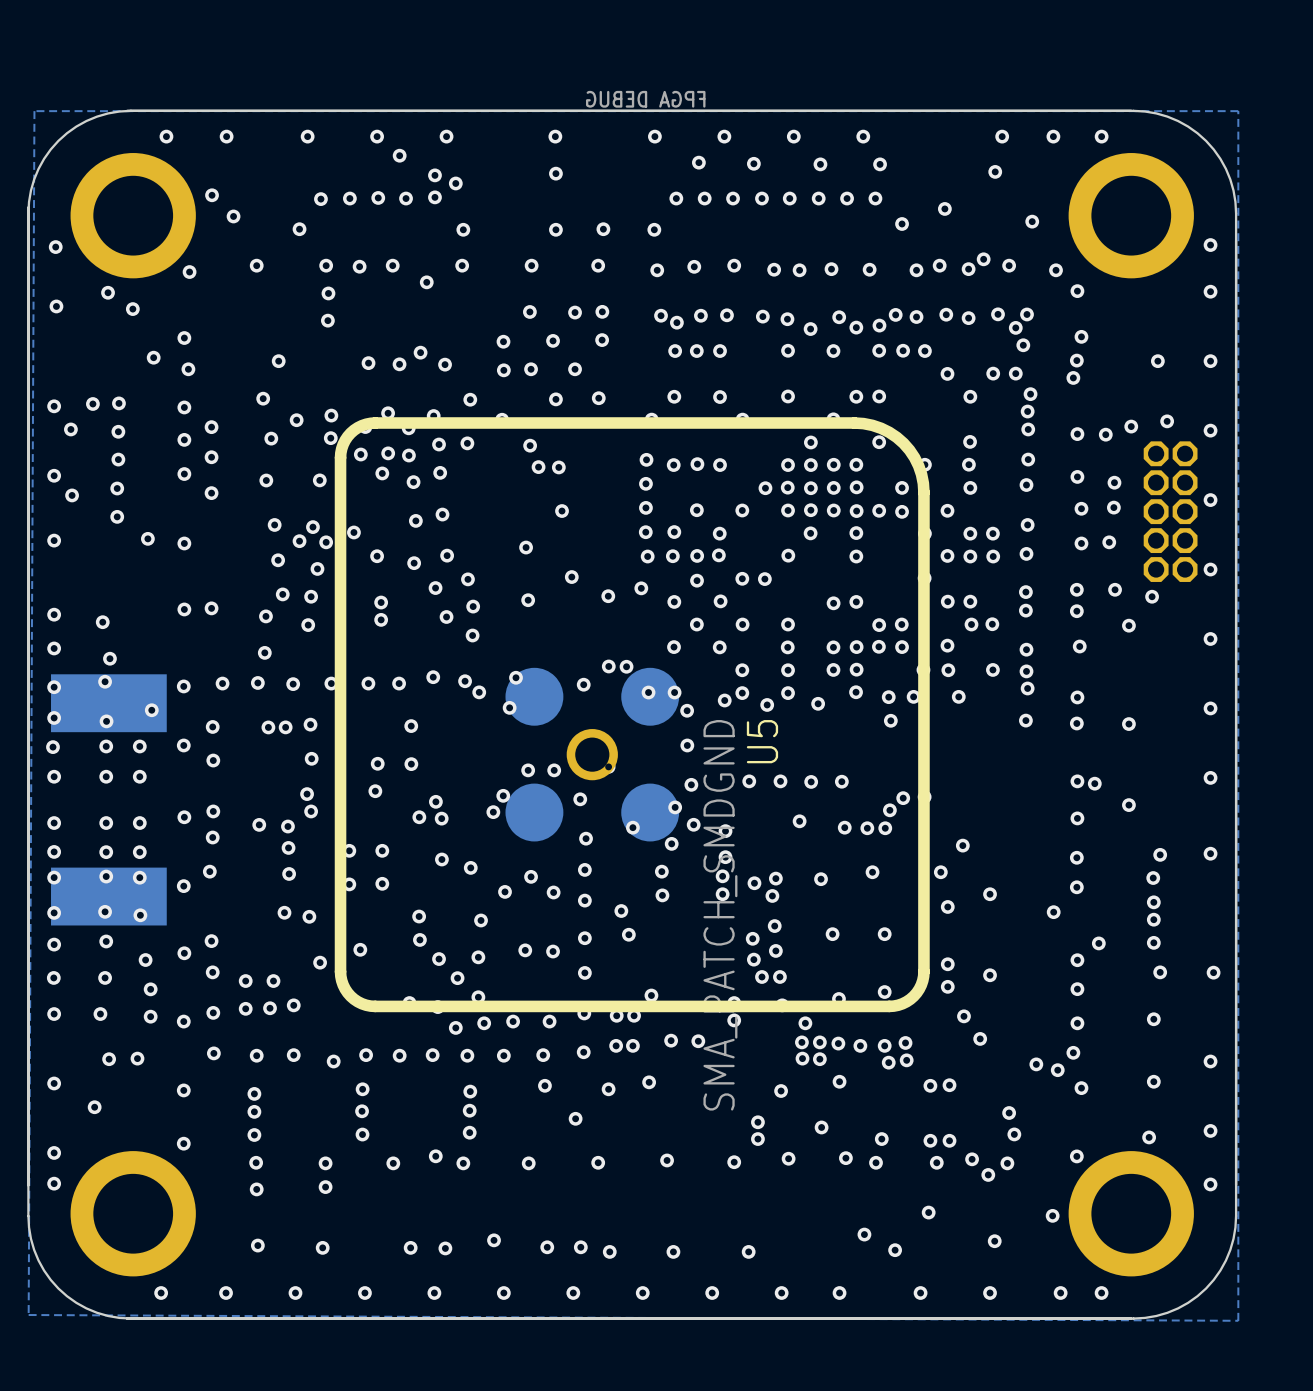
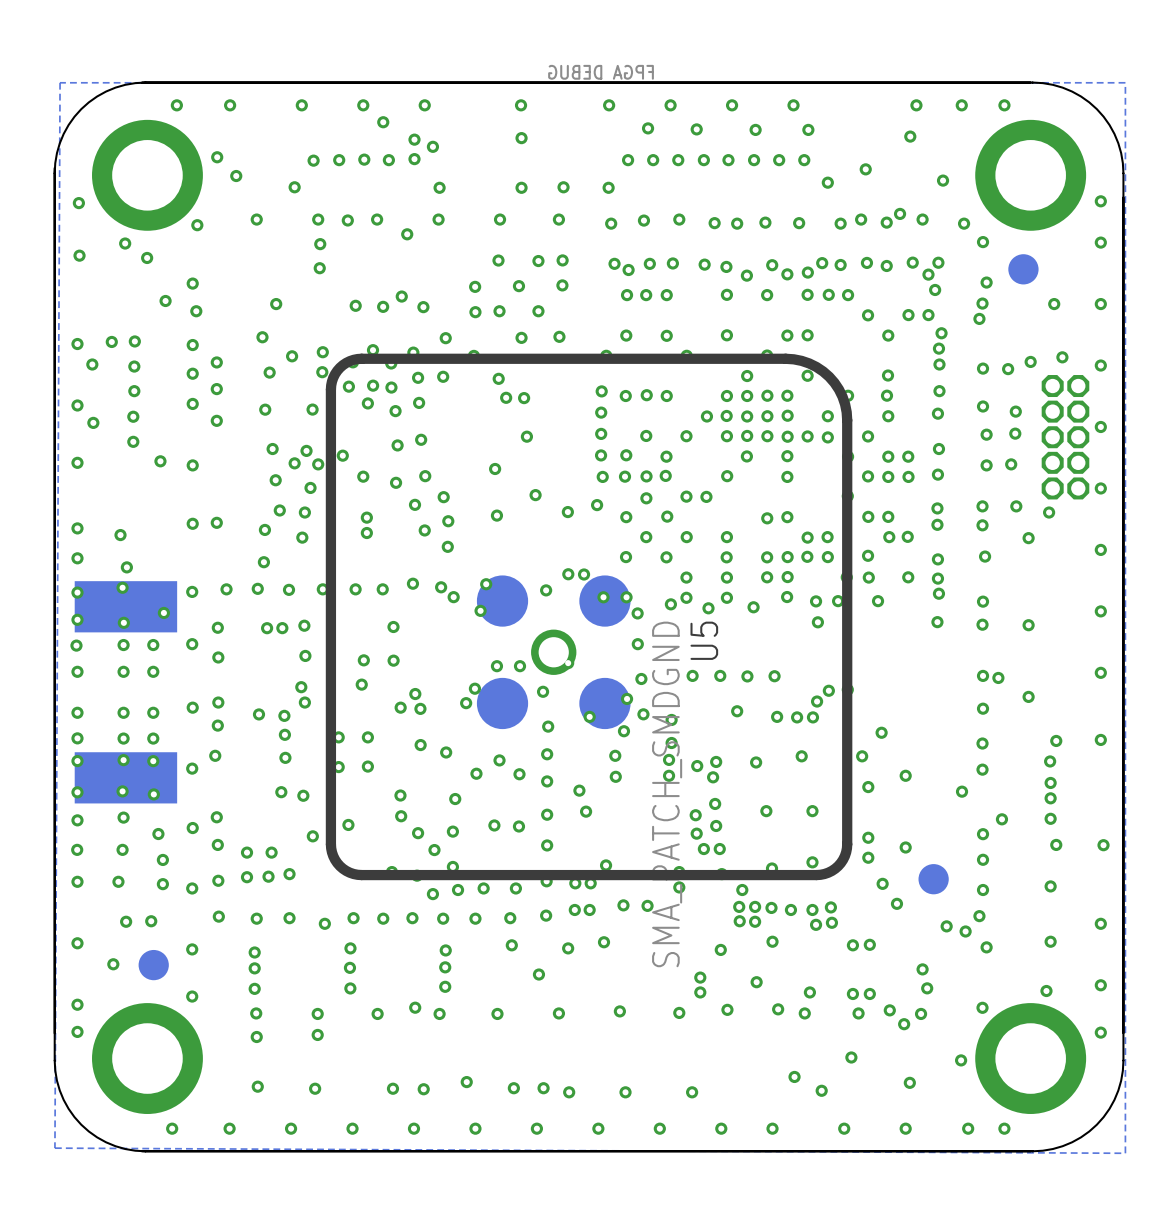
part: none -> (1023, 269)
part: none -> (933, 879)
part: none -> (153, 965)

